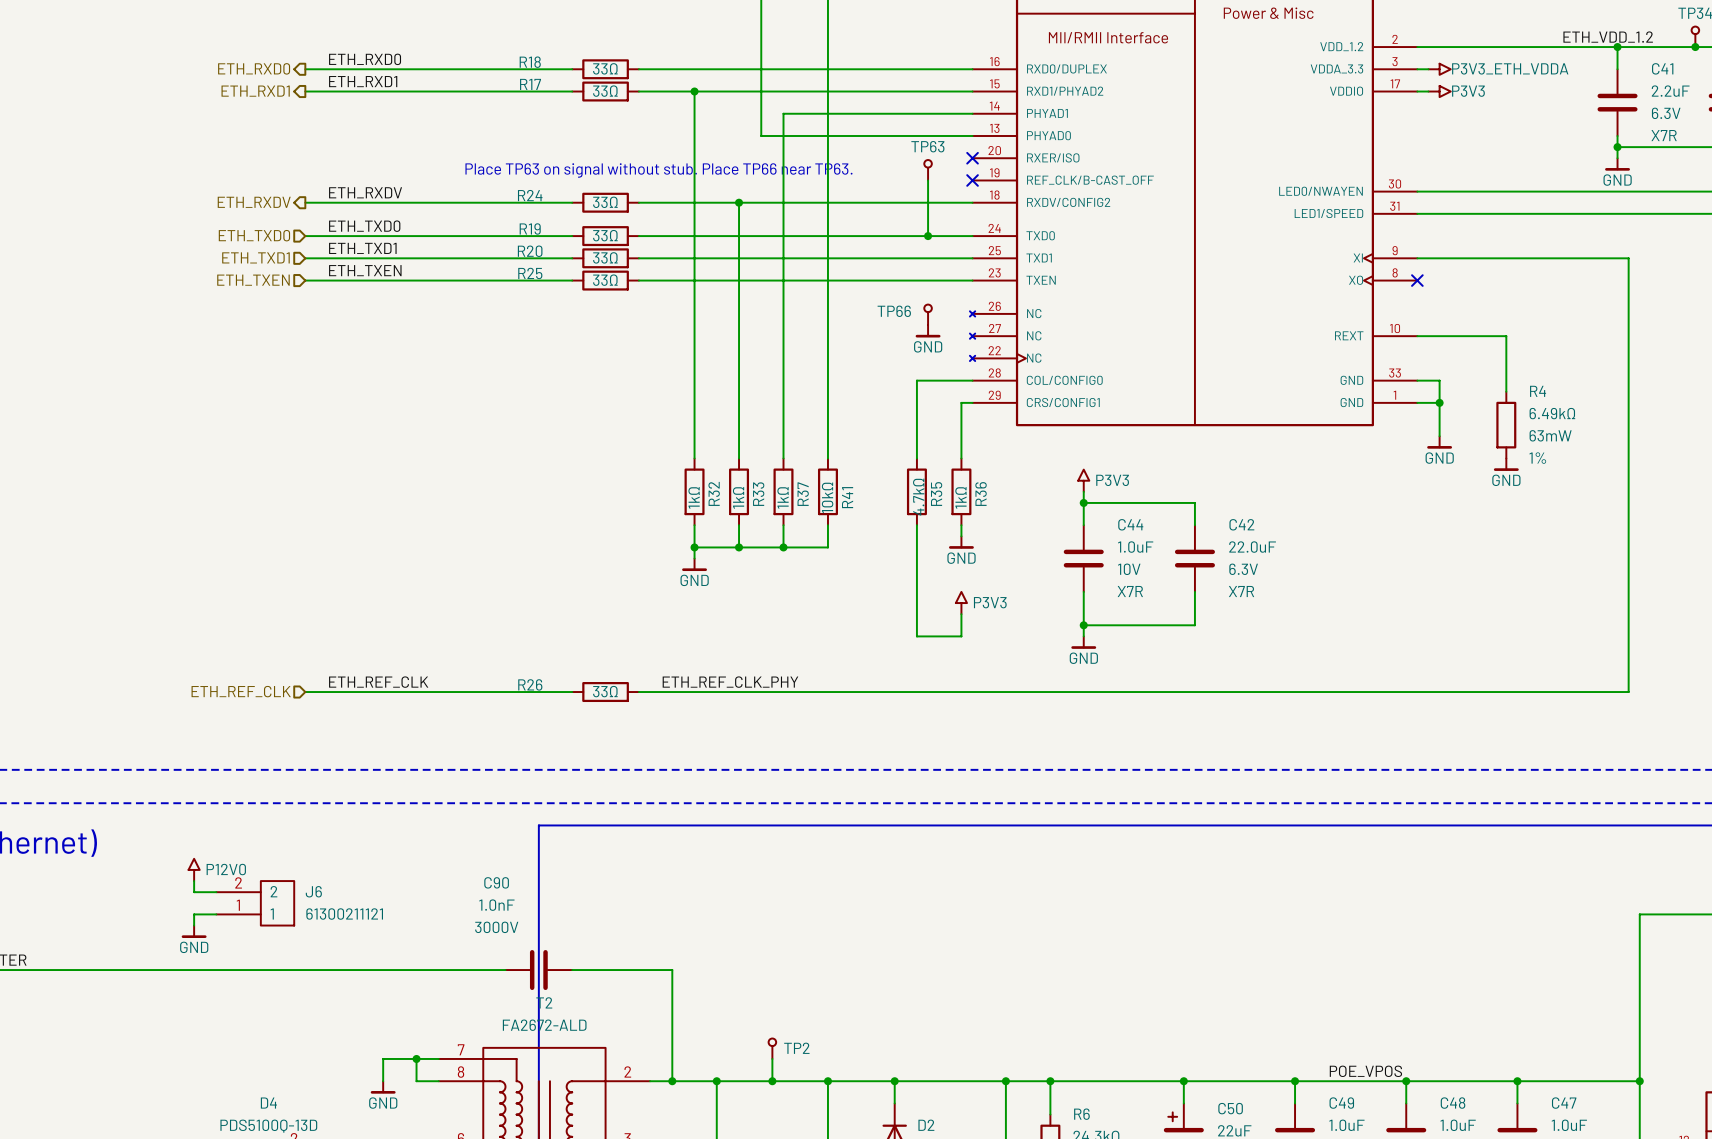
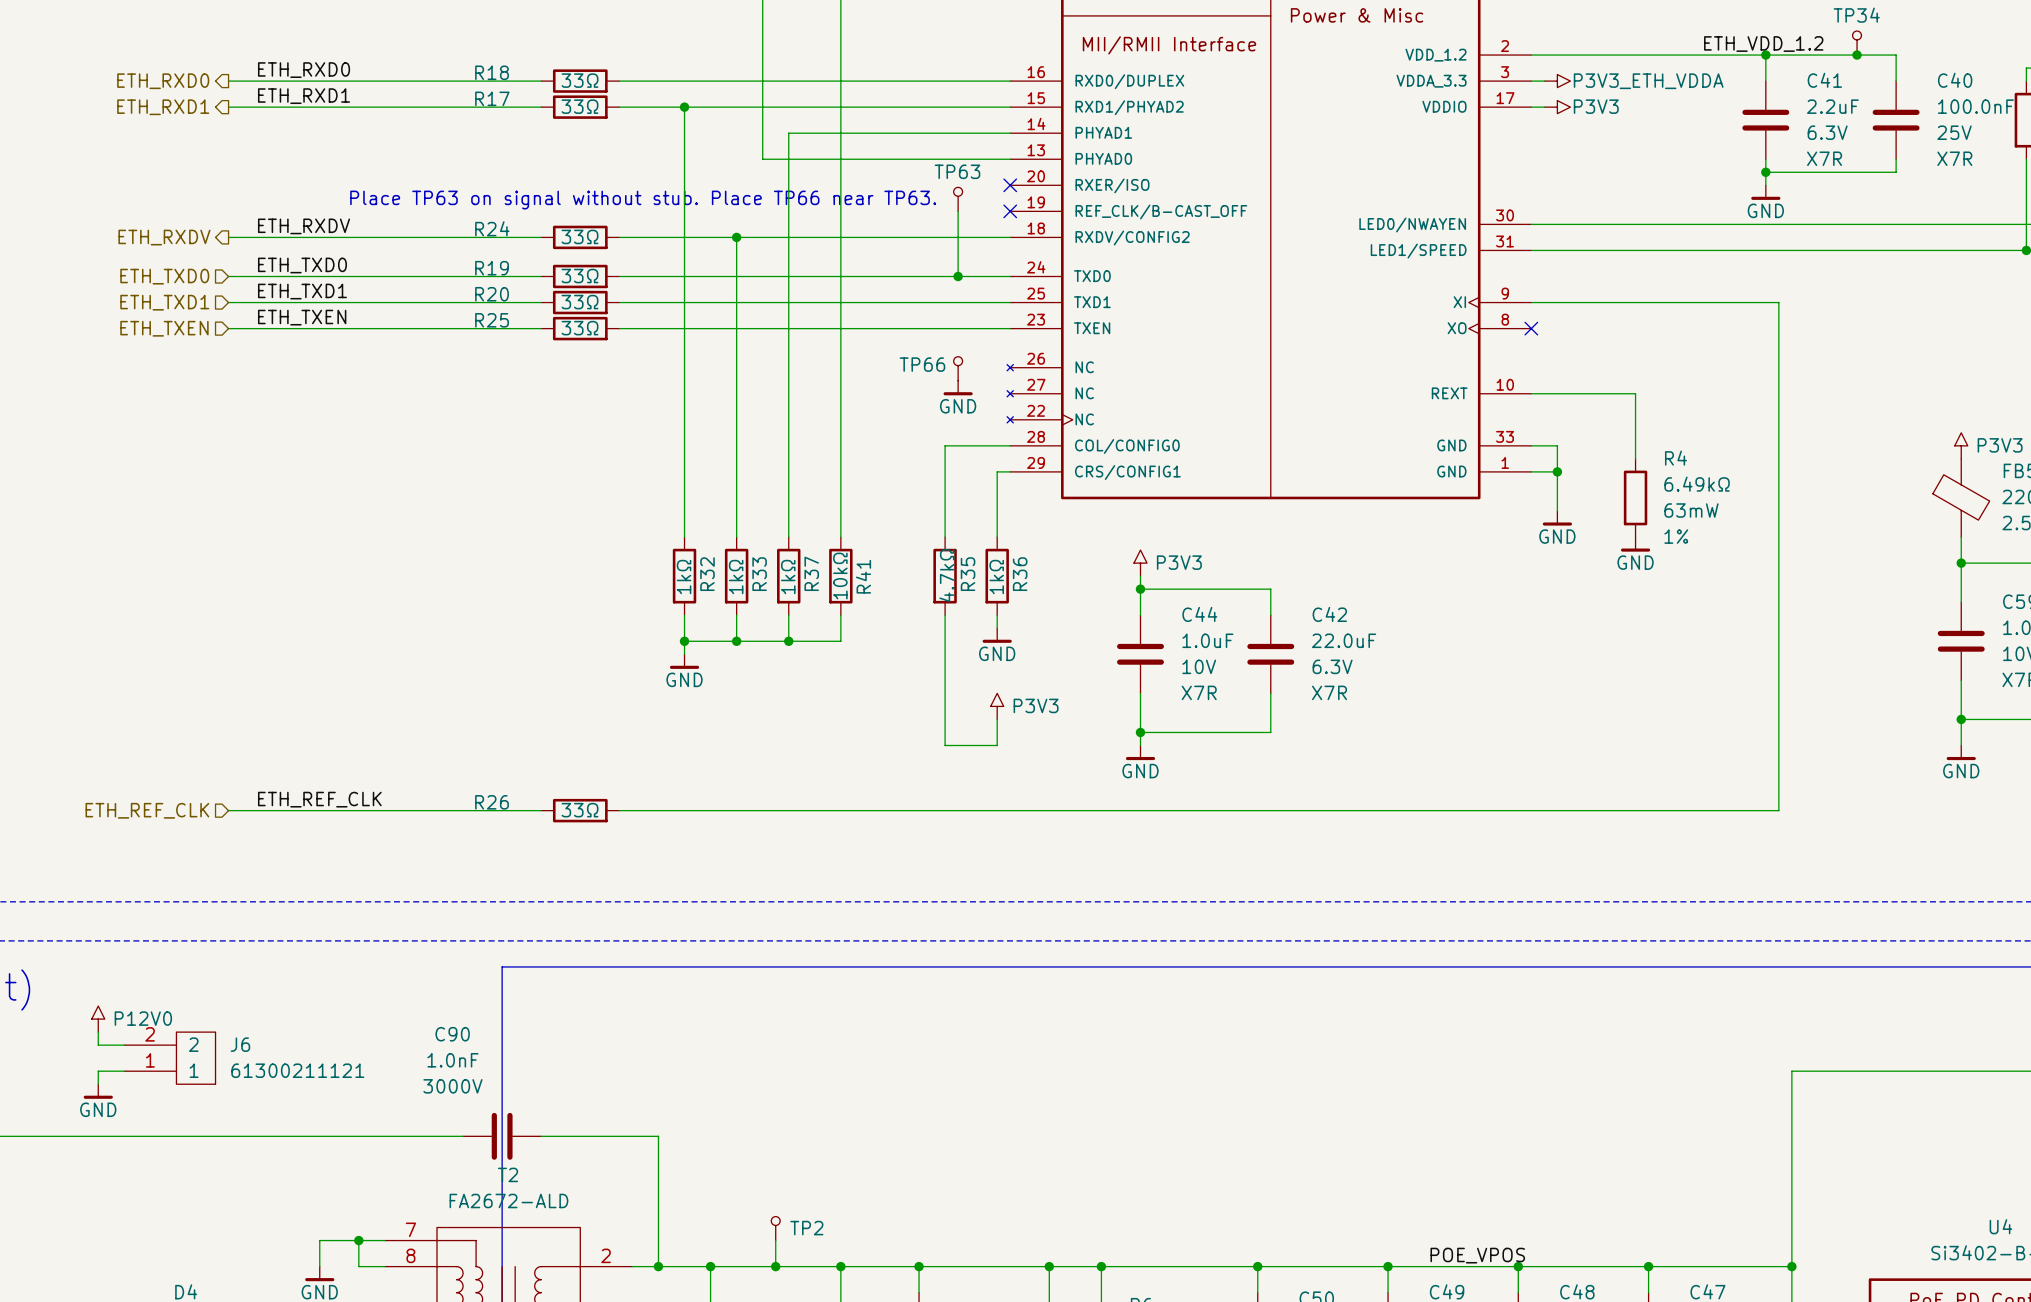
label: ETH_REF_CLK_PHY (730, 682) -> none

